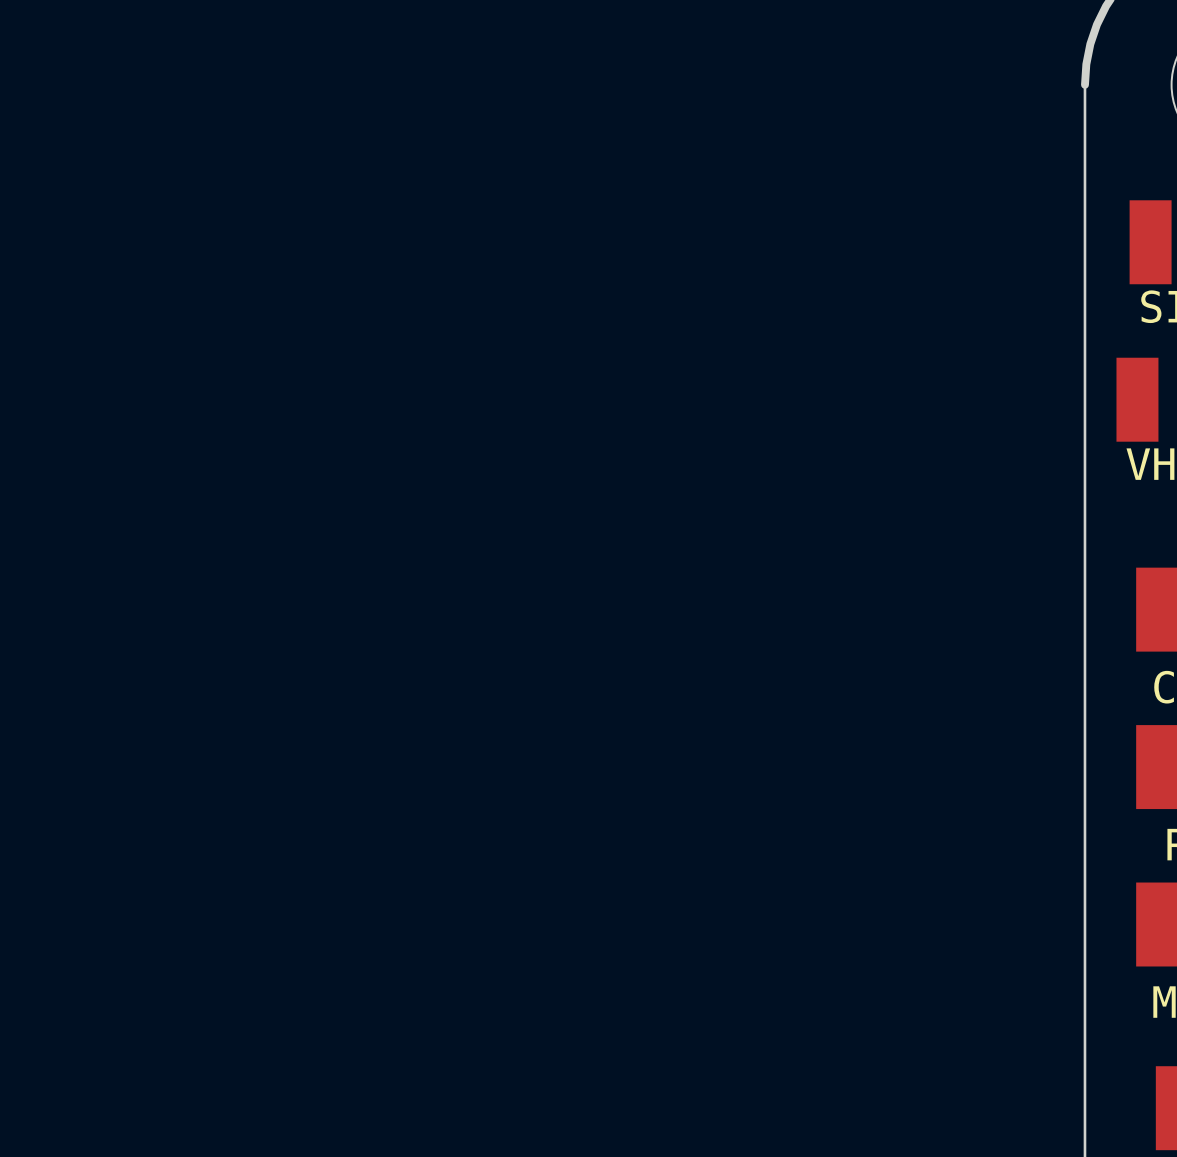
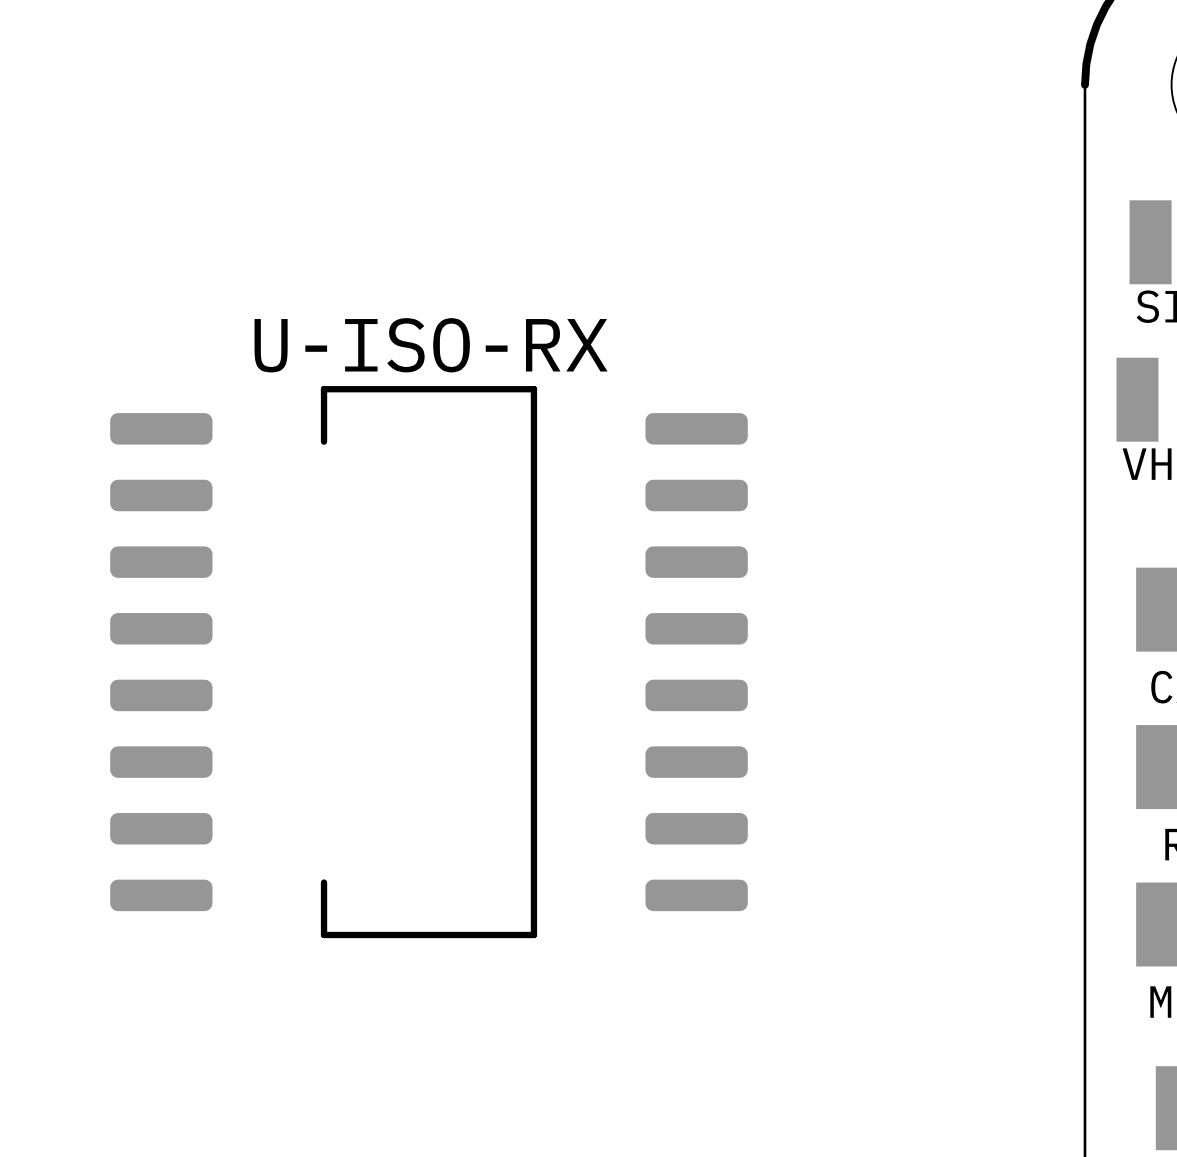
U-ISO-RX: none -> (428, 662)

